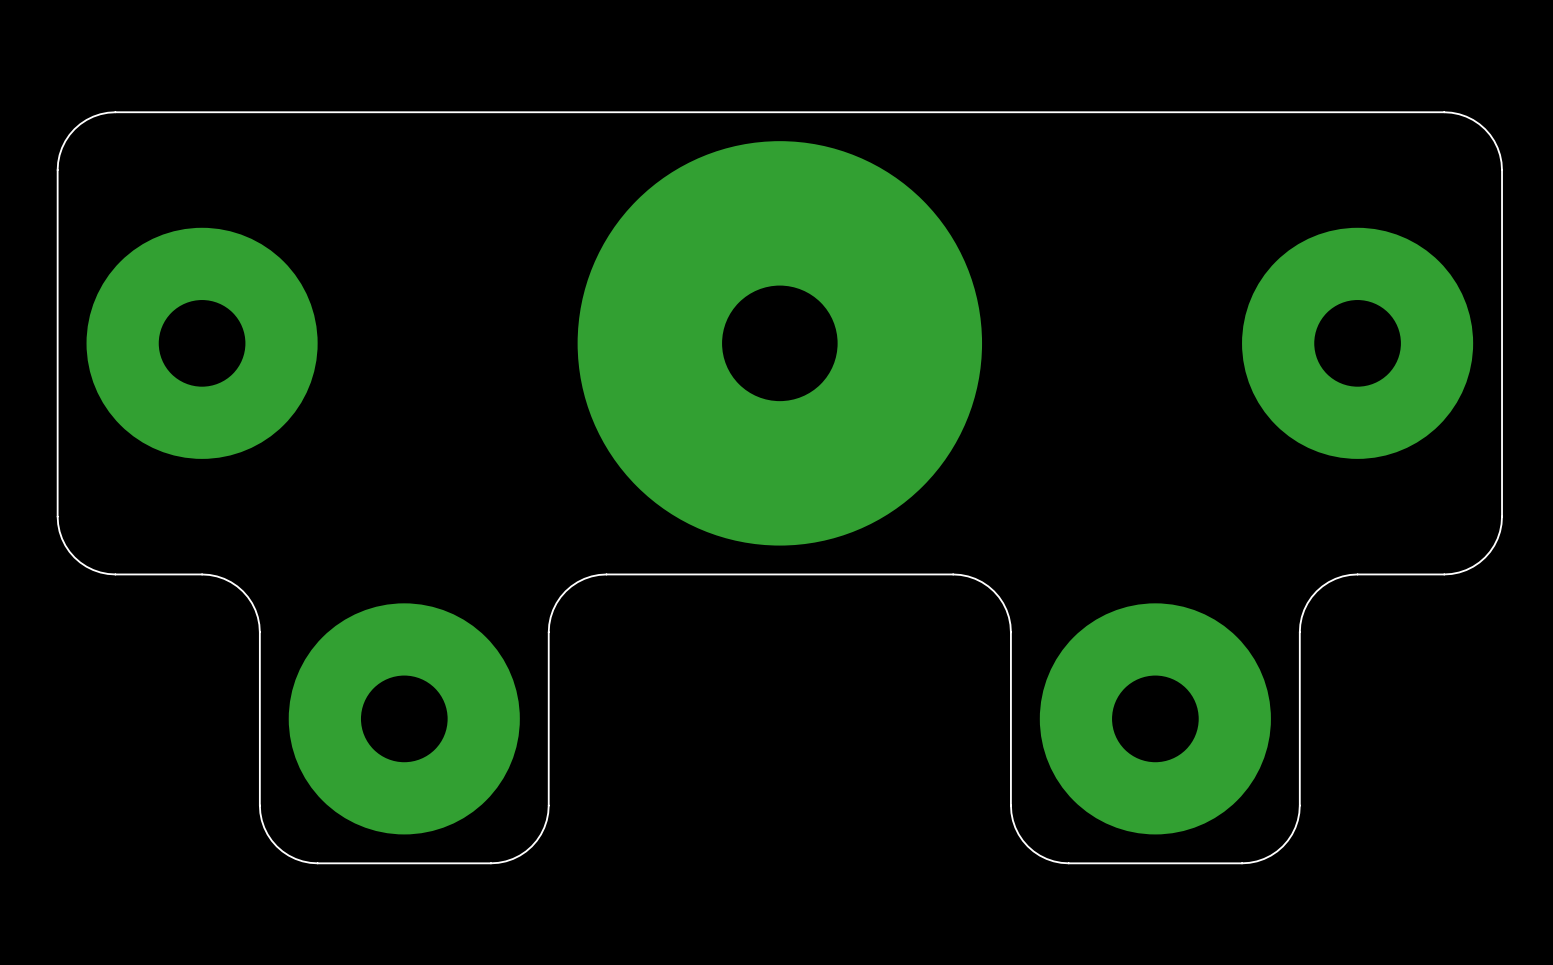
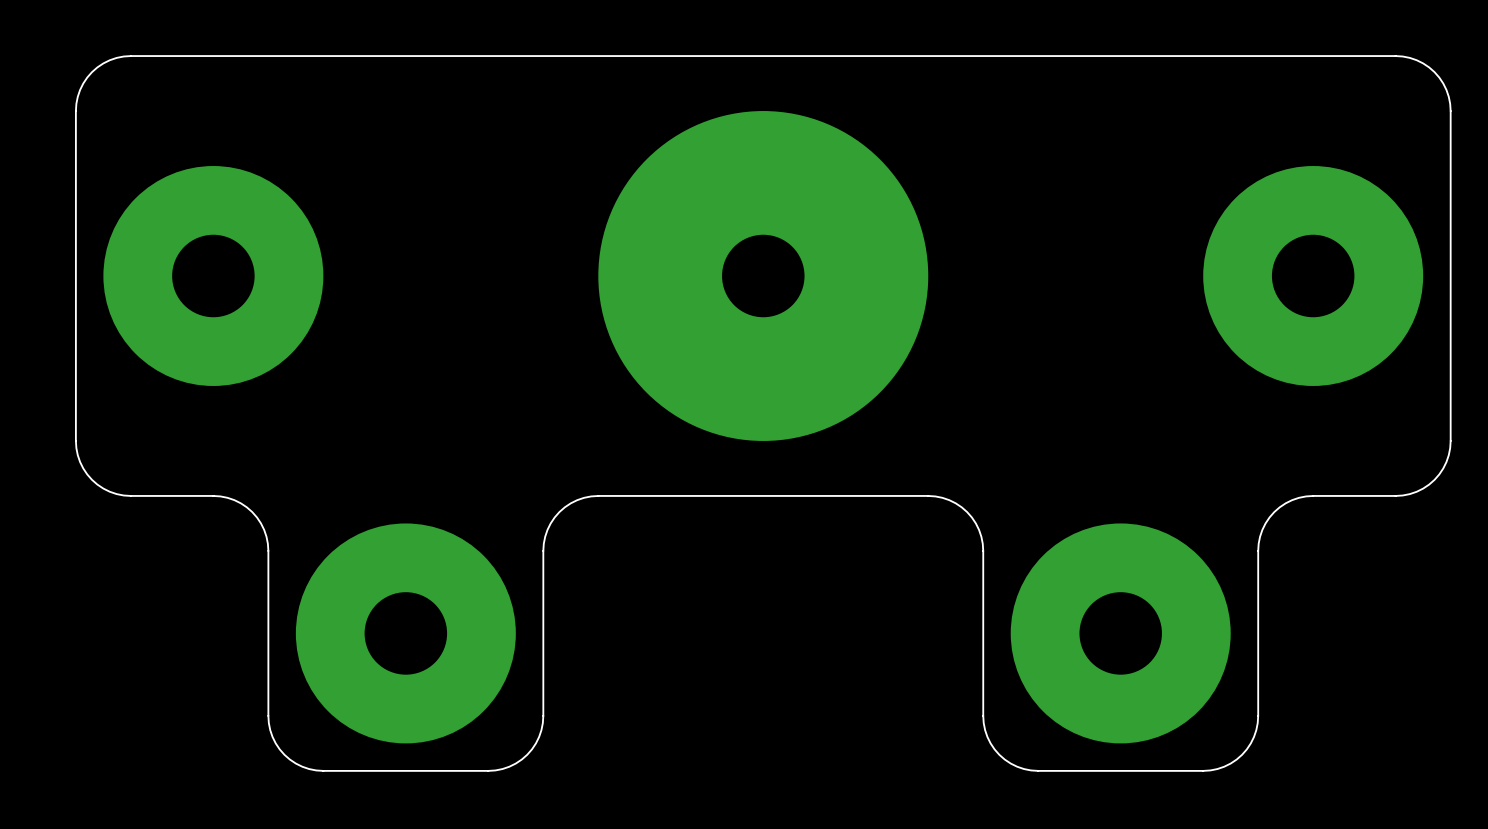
part footprint: [577, 141, 983, 546] -> [598, 111, 929, 441]

